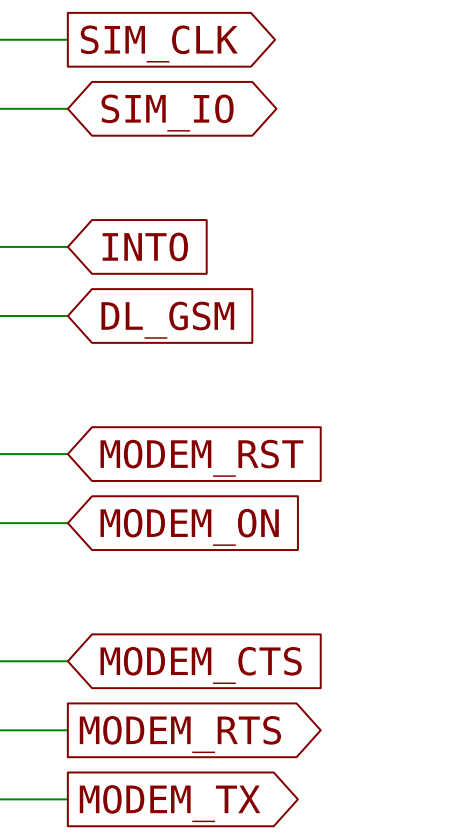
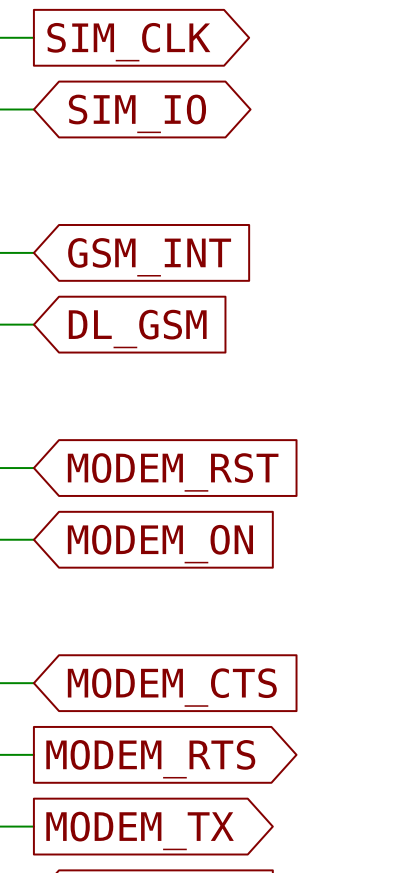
global label: INTO (145, 246) -> GSM_INT (149, 257)

